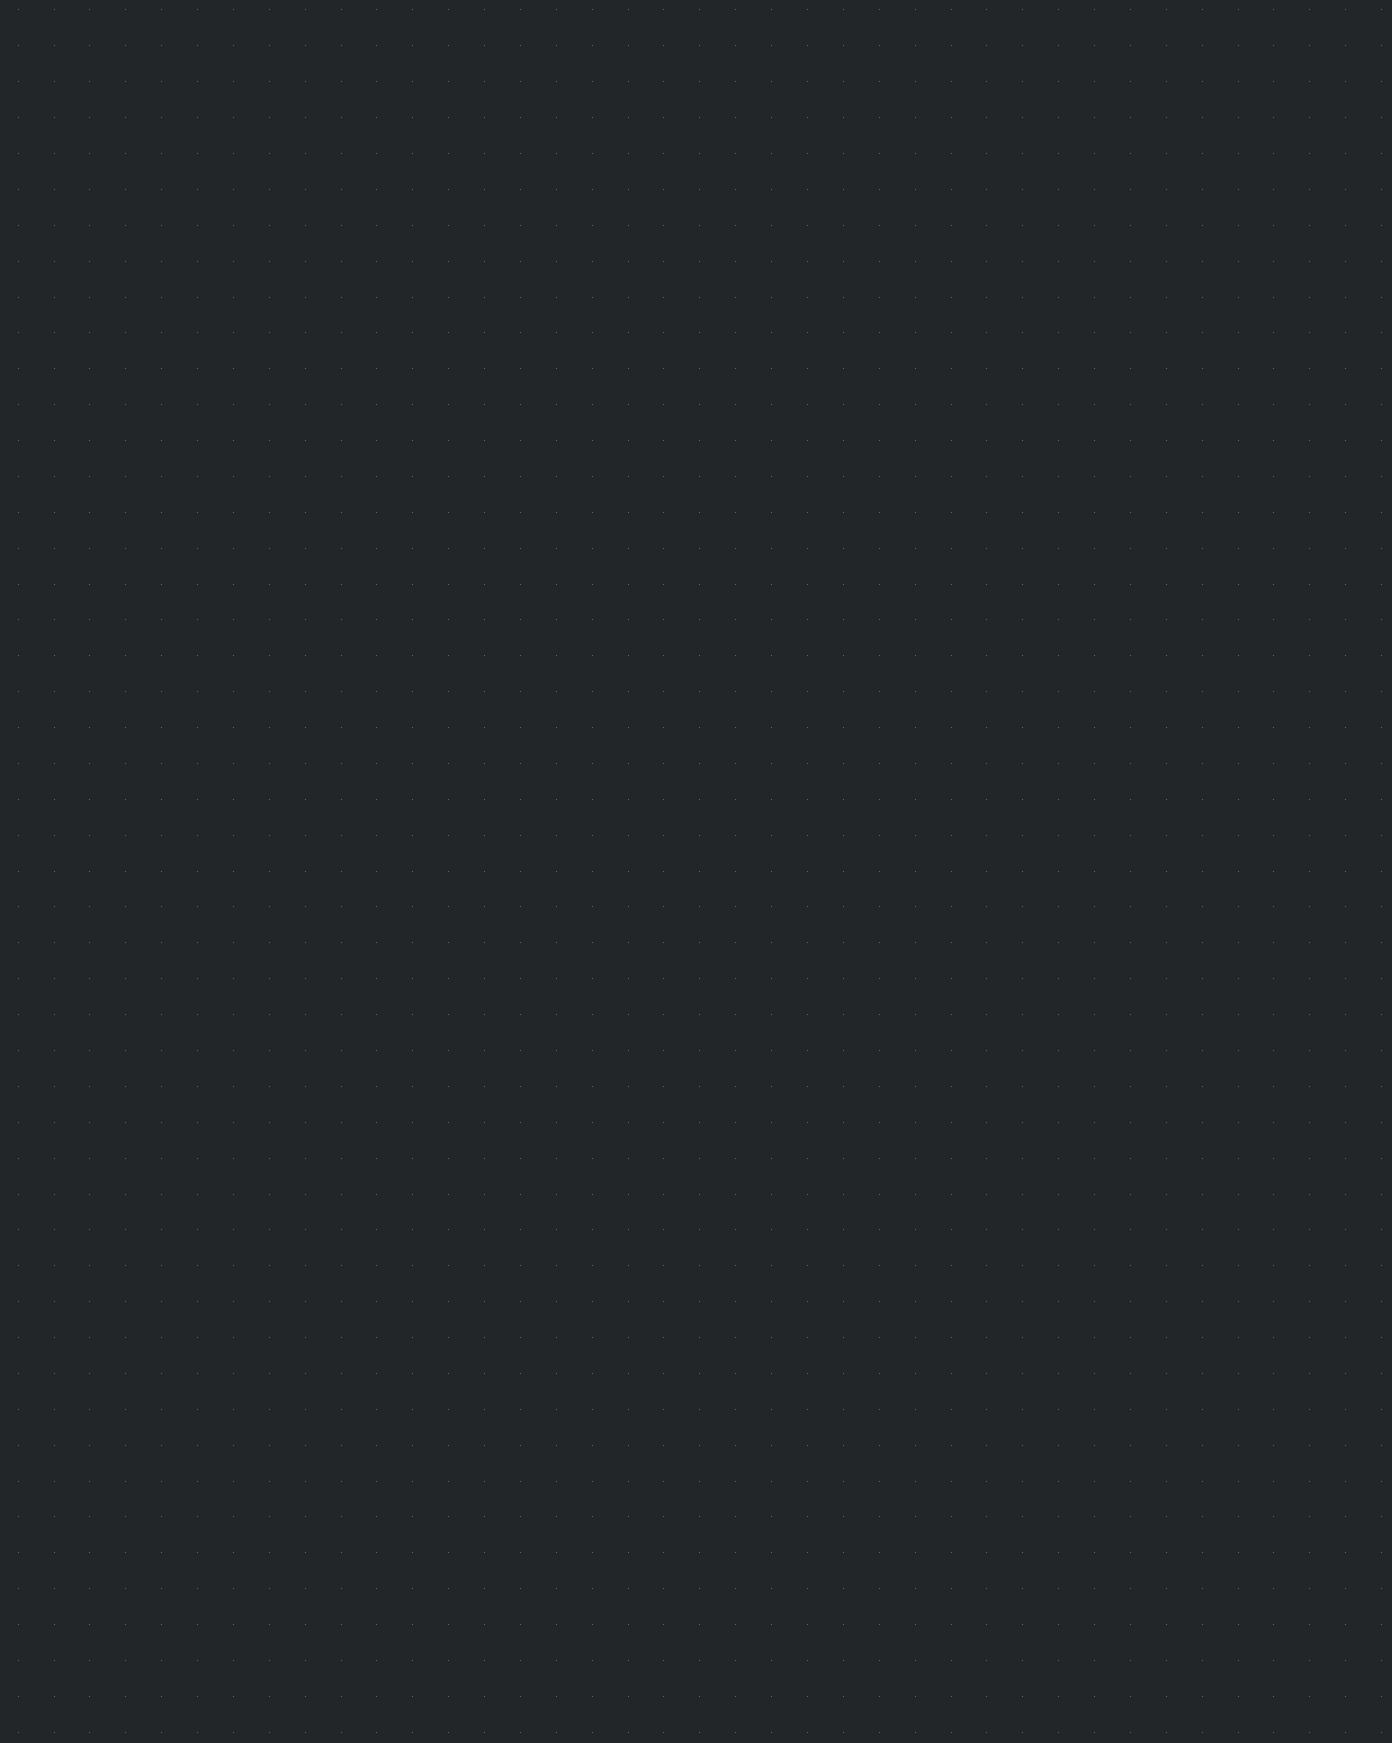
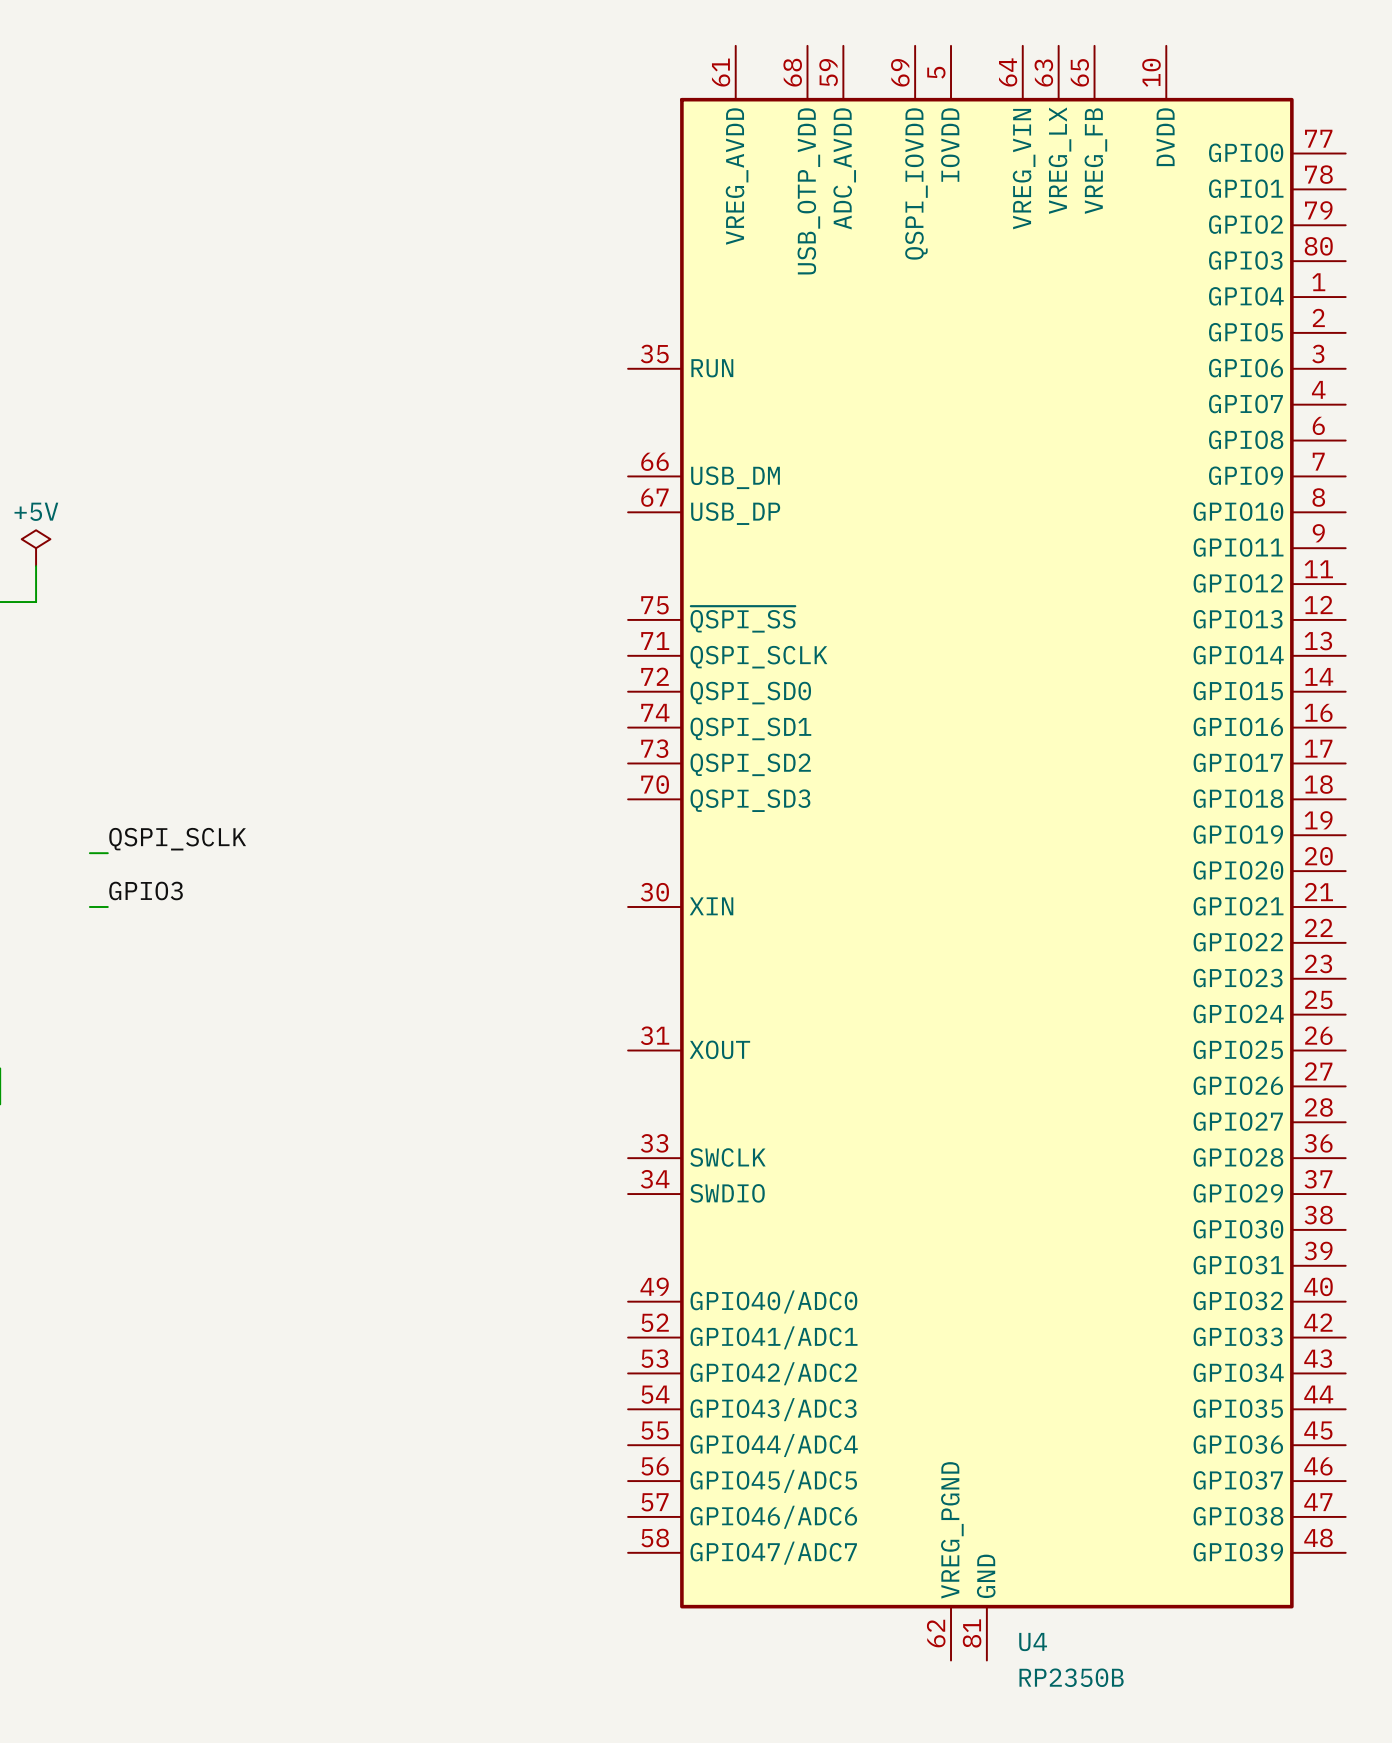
power symbol: none -> +5V (36, 548)
wire: none -> (36, 566) (36, 602) (0, 602)
label: none -> QSPI_SCLK (177, 839)
wire: none -> (89, 853) (107, 853)
U4: none -> RP2350B (986, 853)
label: none -> GPIO3 (146, 890)
wire: none -> (89, 906) (107, 906)
wire: none -> (0, 1068) (0, 1104)

